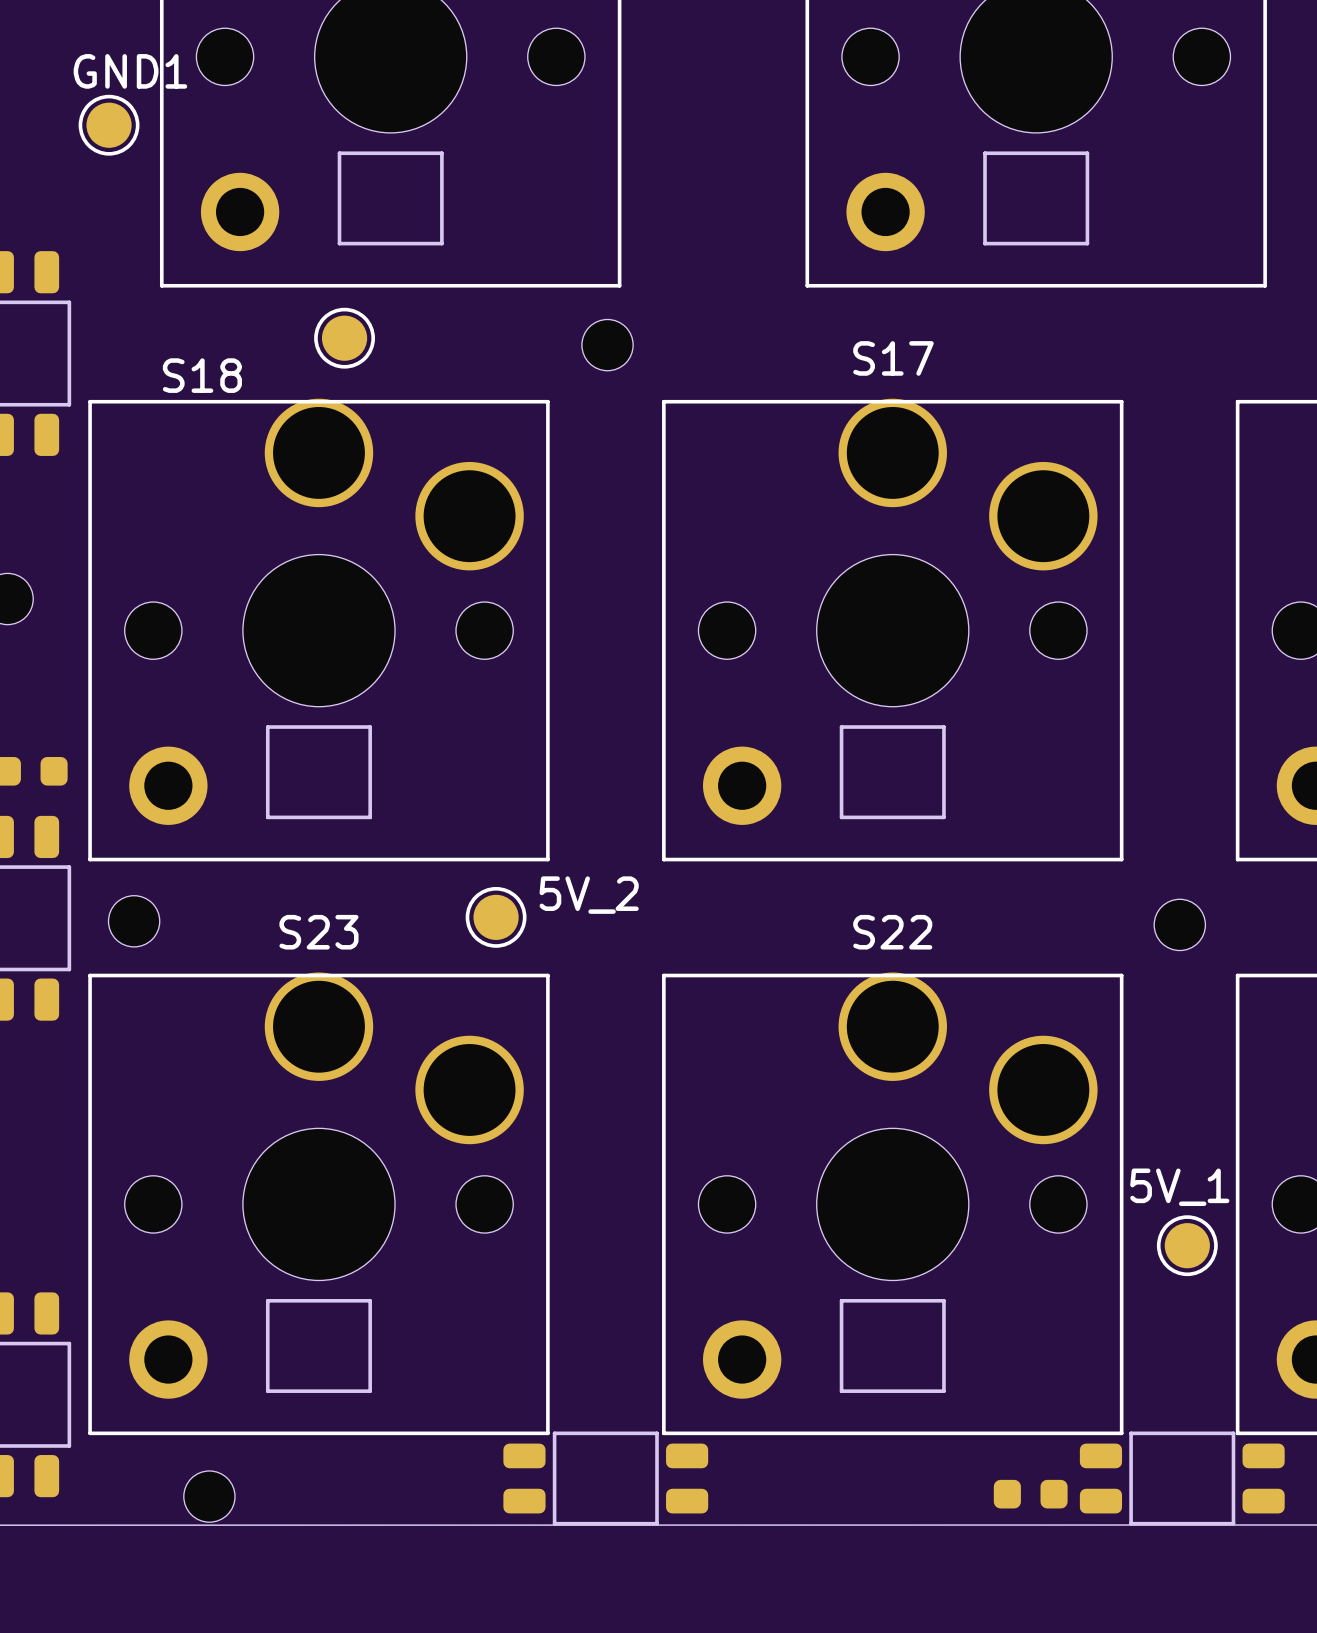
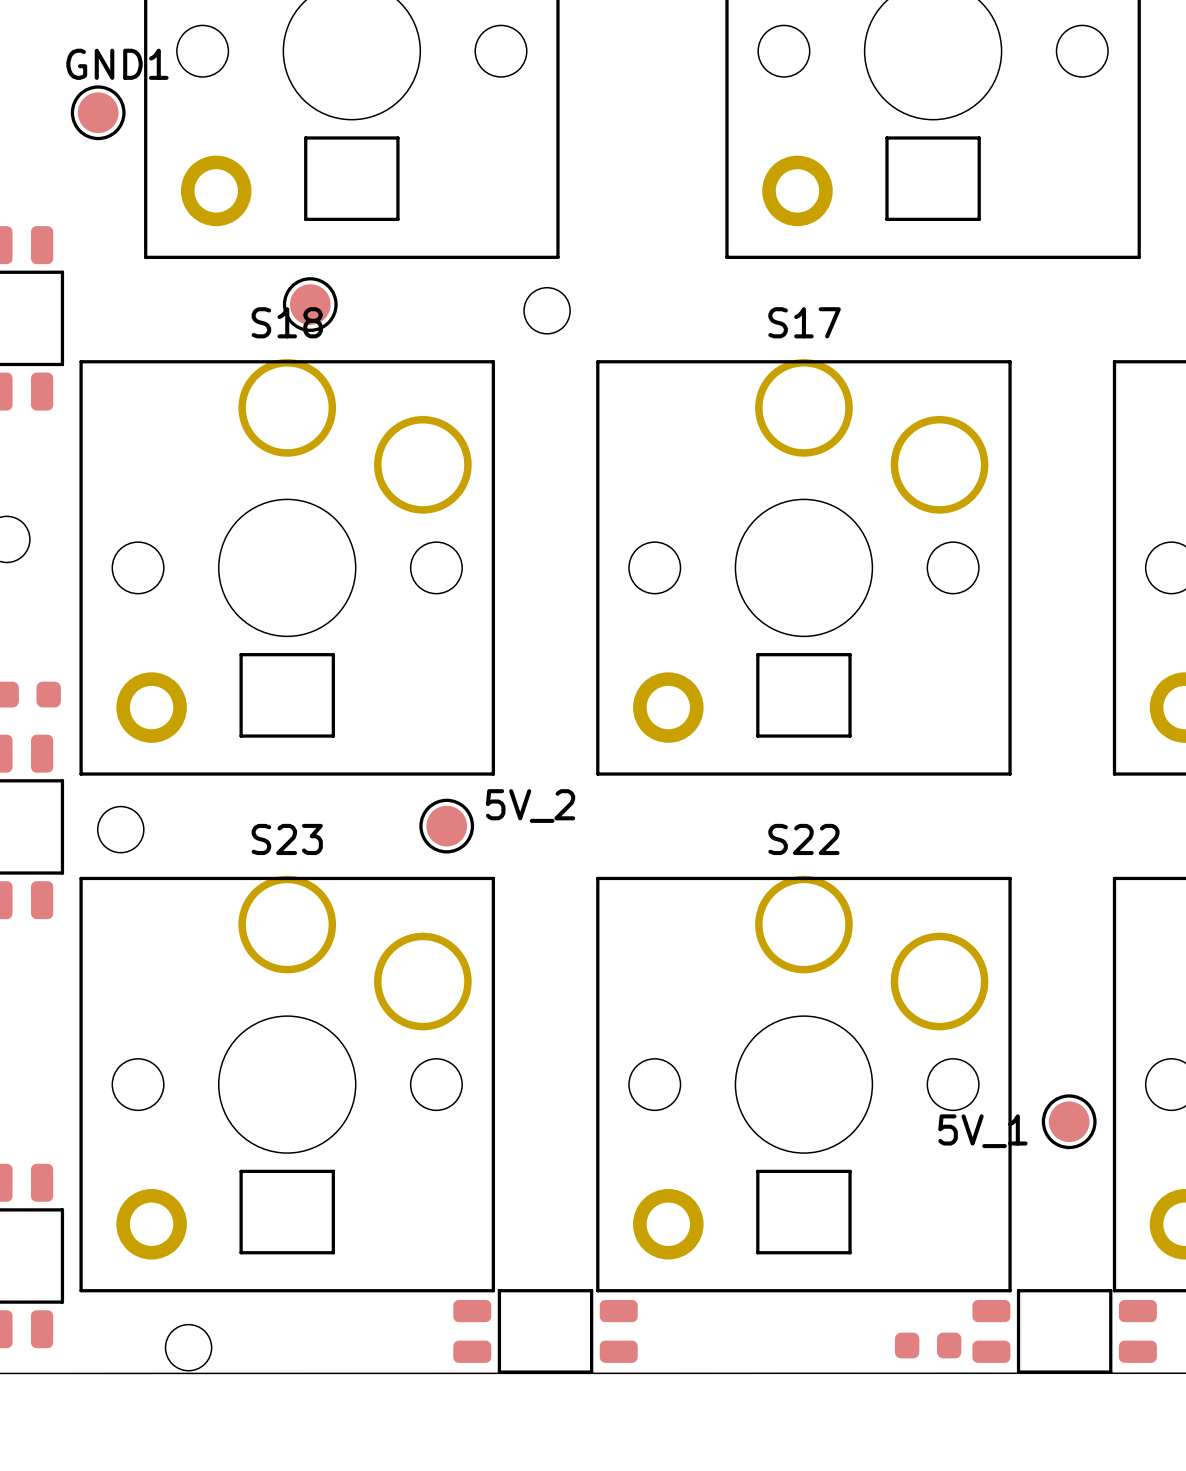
S18 name position: S18 (202, 375) -> S18 (287, 322)
part: (1179, 924) -> none
5V_1 name position: 5V_1 (1179, 1187) -> 5V_1 (982, 1131)

